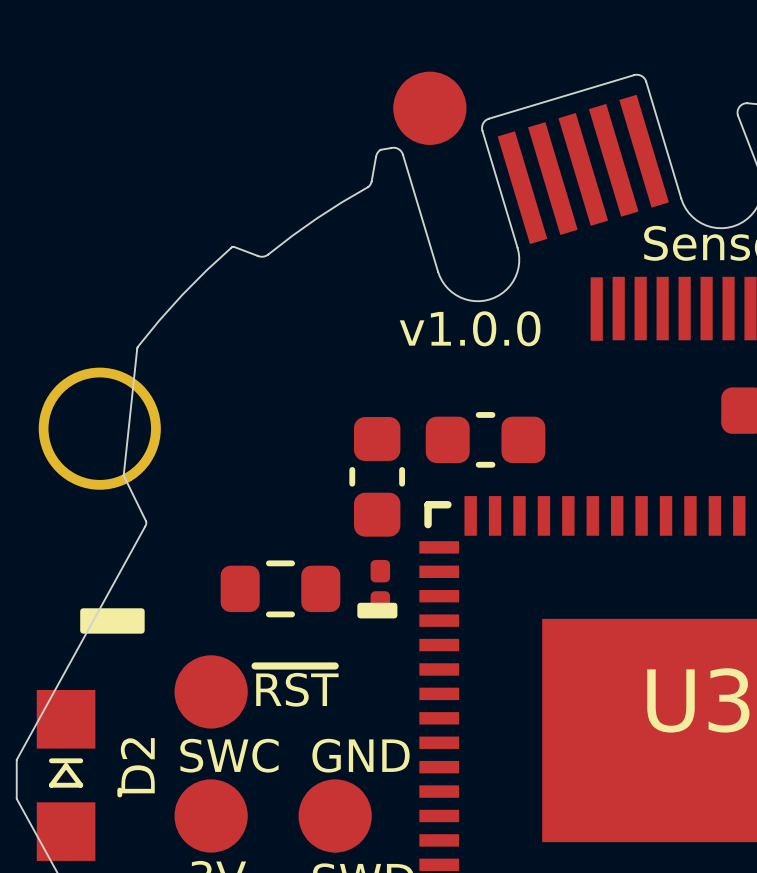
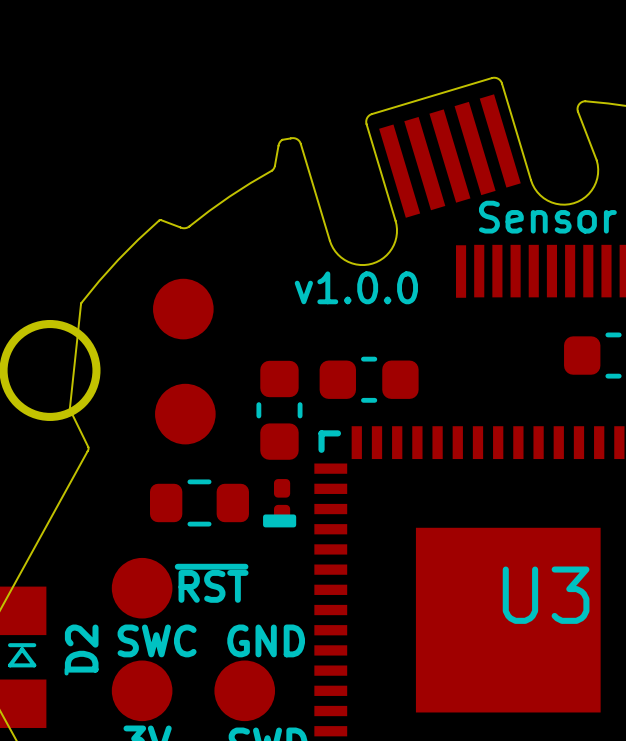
part: (429, 108) -> none
part: none -> (183, 309)
part: none -> (185, 414)
drawing: [80, 608, 145, 634] -> none

